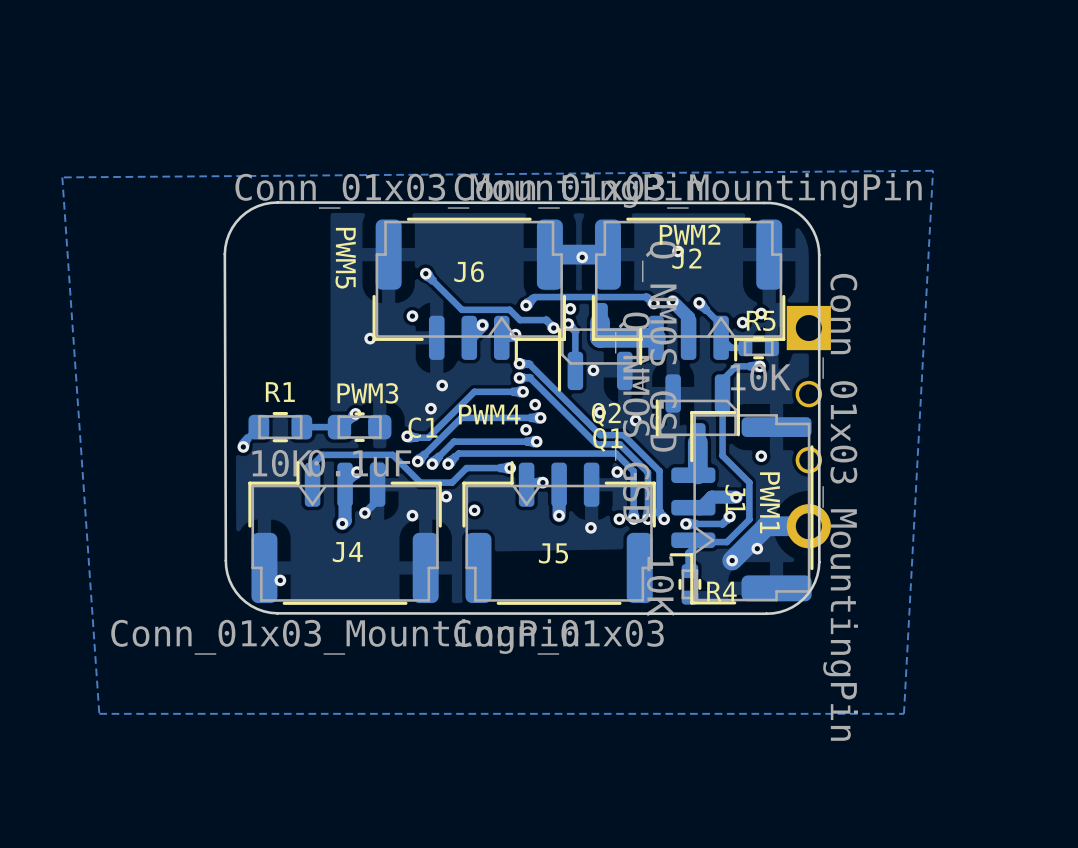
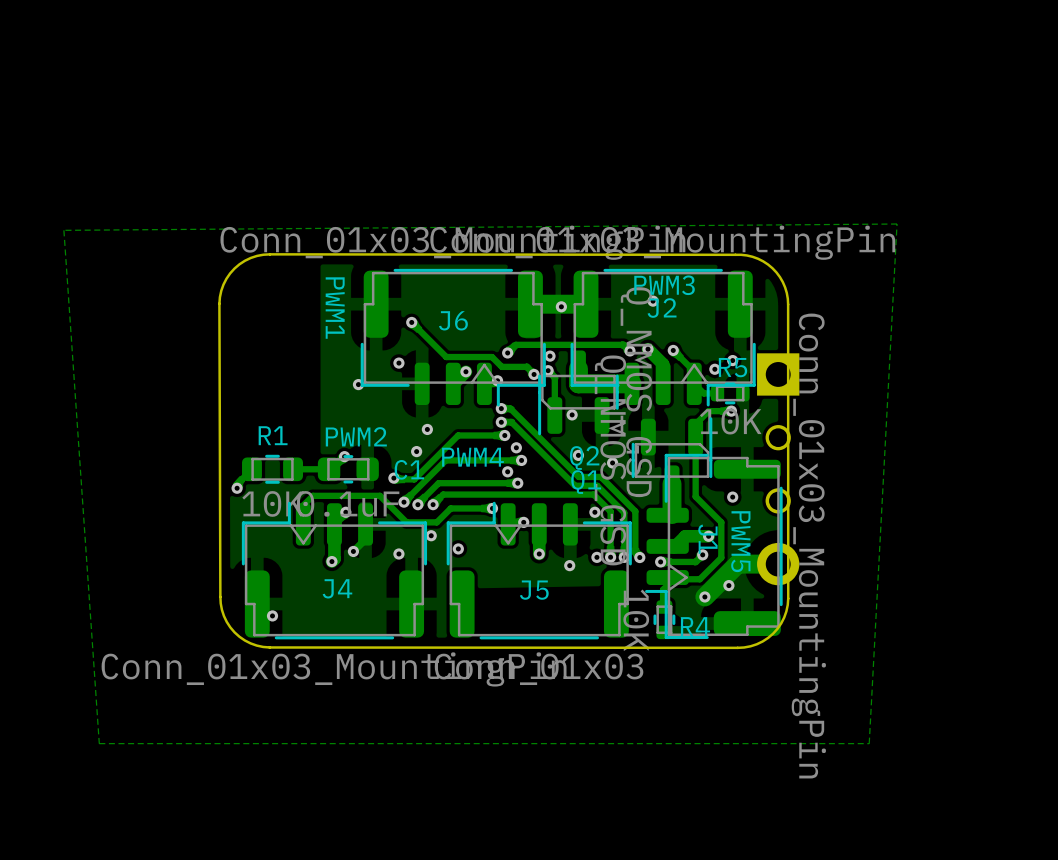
text: PWM2 (690, 234) -> PWM3 (664, 285)
text: PWM5 (345, 258) -> PWM1 (335, 308)
text: PWM3 (367, 393) -> PWM2 (356, 436)
text: PWM1 (769, 502) -> PWM5 (740, 541)

